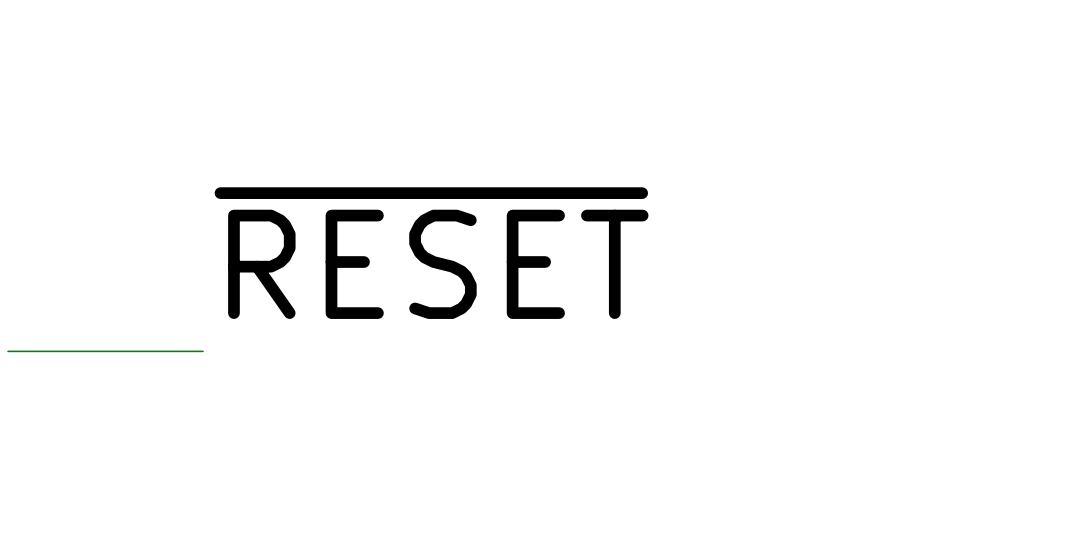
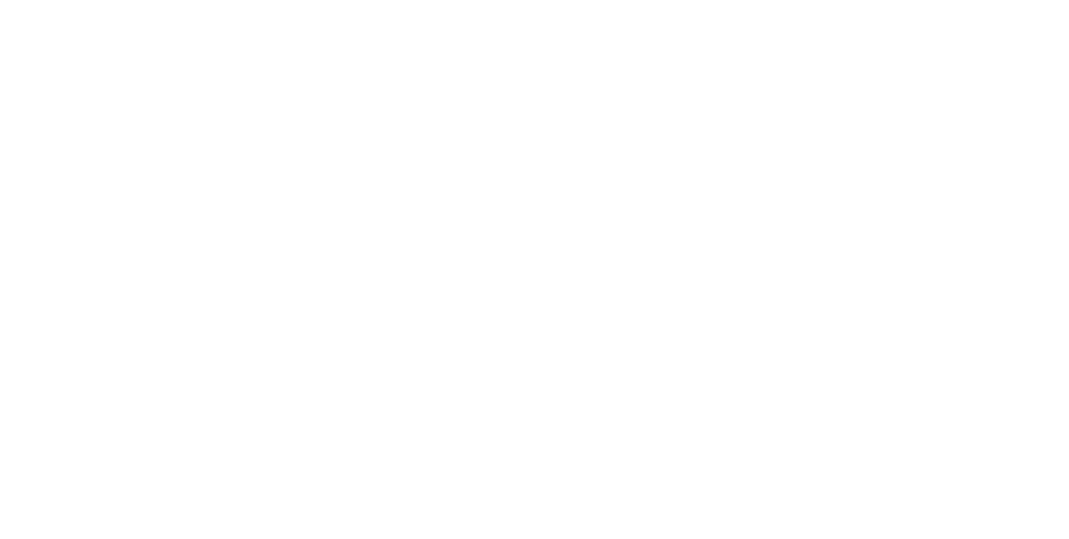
label: ~{RESET} (431, 253) -> none
wire: (7, 351) (203, 351) -> none

